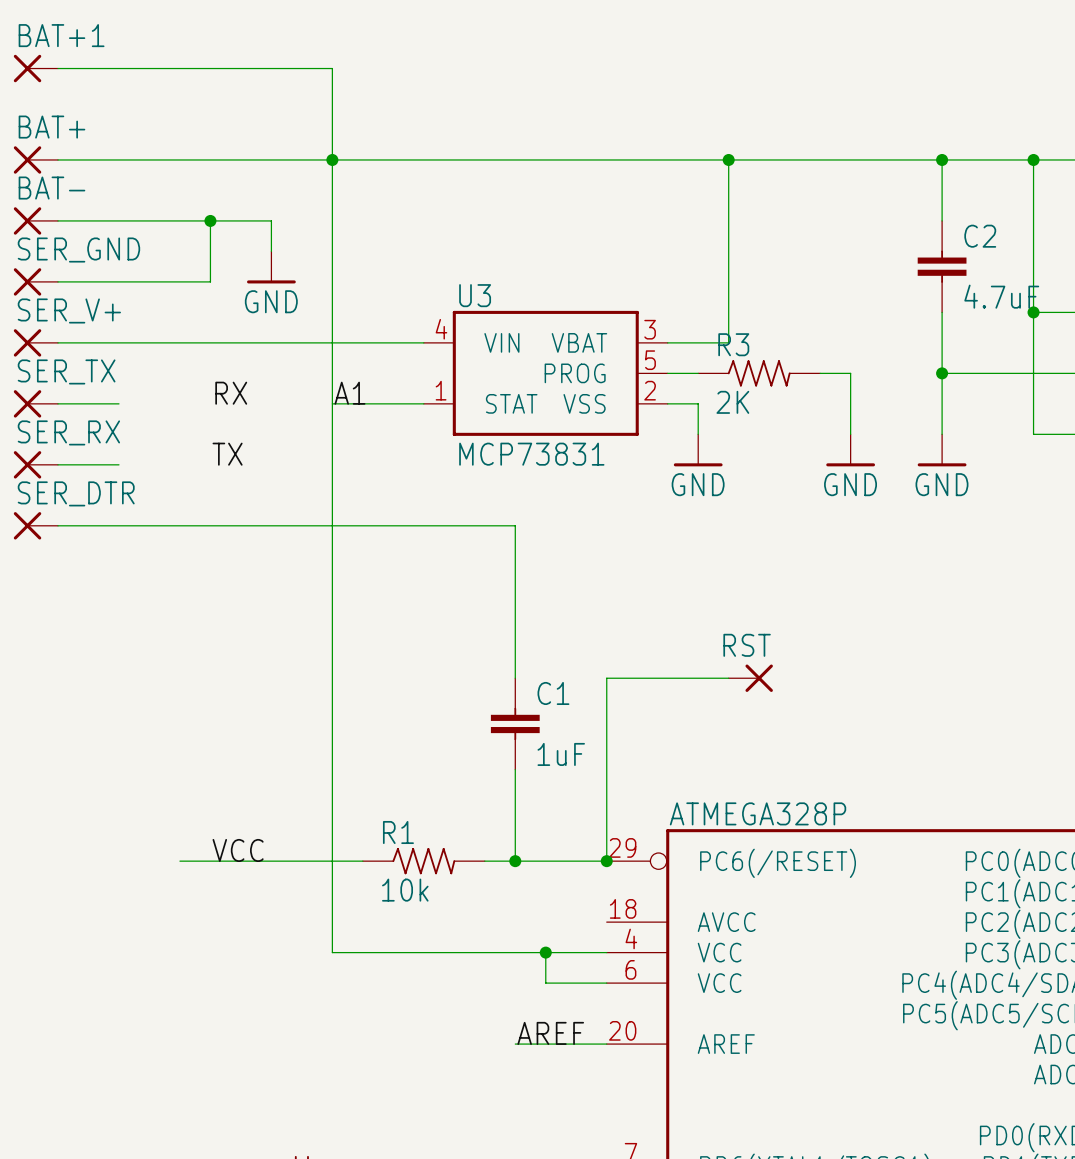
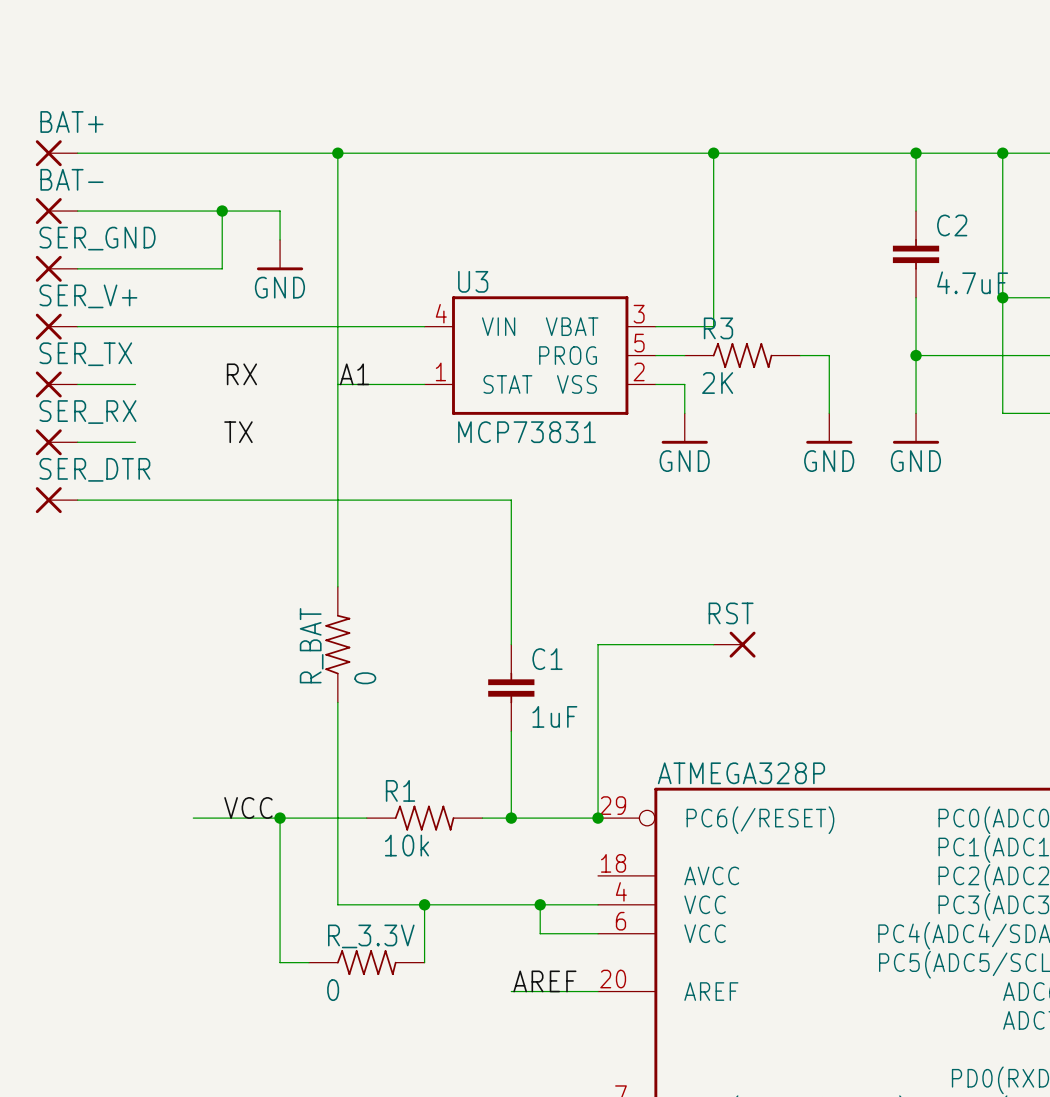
BAT+1: (35, 68) -> none
wire: (58, 68) (332, 68) (332, 159) -> none
R_BAT: none -> 0 (337, 644)
wire: none -> (280, 818) (280, 962) (308, 962)
junction: none -> (280, 818)
wire: none -> (424, 904) (424, 962)
junction: none -> (424, 904)
R_3.3V: none -> 0 (366, 962)

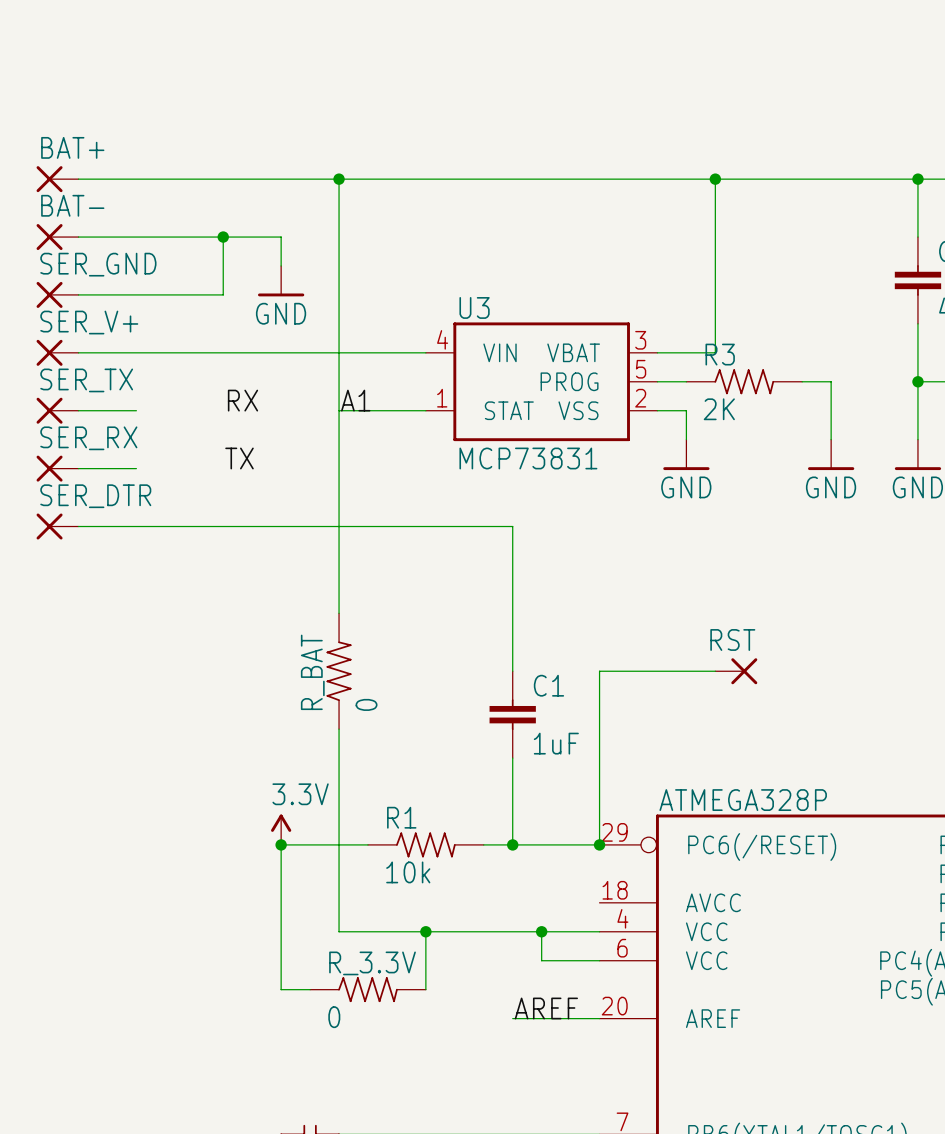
power symbol: none -> 3.3V (281, 829)
label: VCC (248, 807) -> none
wire: (193, 818) (280, 818) -> none

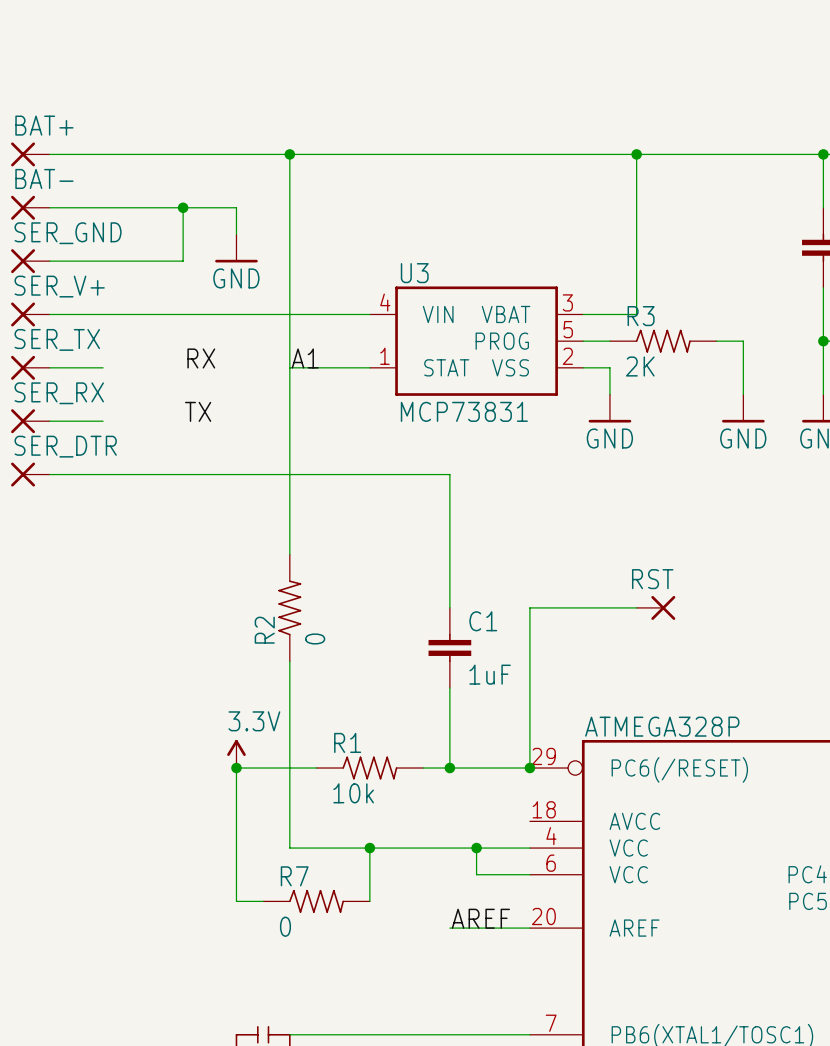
R_BAT name: R_BAT (312, 672) -> R2 (264, 630)
R_3.3V name: R_3.3V (372, 963) -> R7 (294, 876)

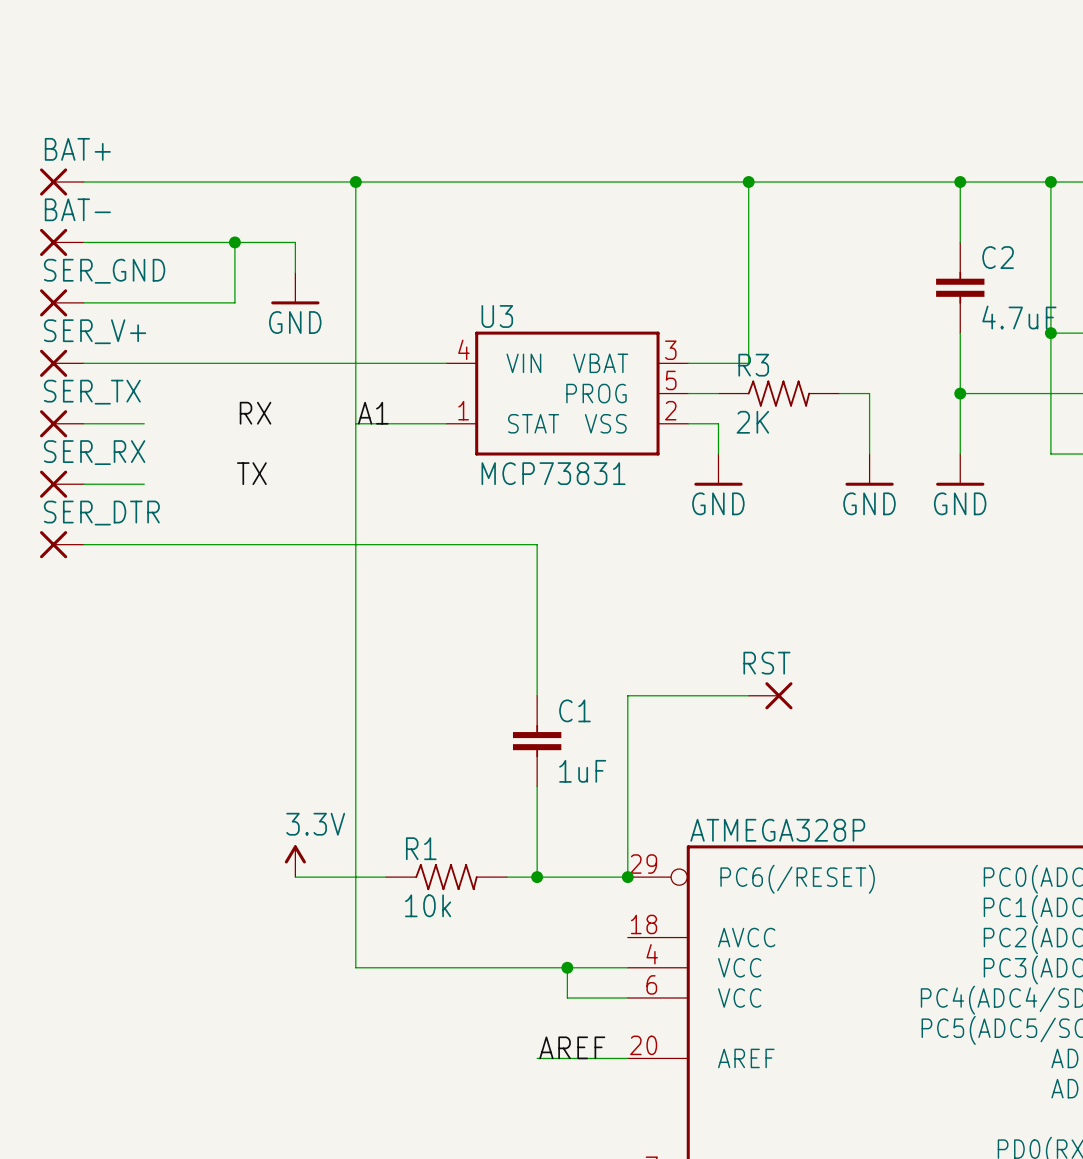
R2: 0 (289, 607) -> none
wire: (236, 768) (236, 901) (263, 901) -> none
junction: (236, 768) -> none
wire: (369, 848) (369, 901) -> none
junction: (369, 848) -> none
R7: 0 (316, 901) -> none

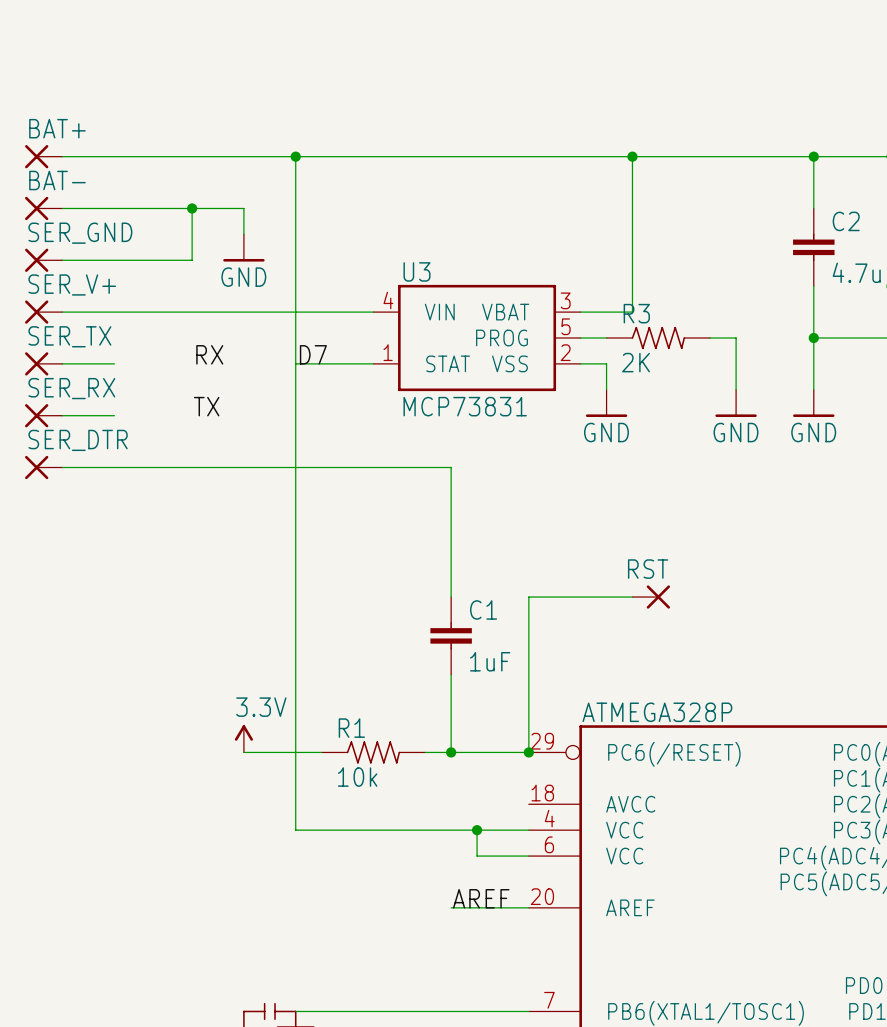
label: A1 (373, 413) -> D7 (313, 354)

